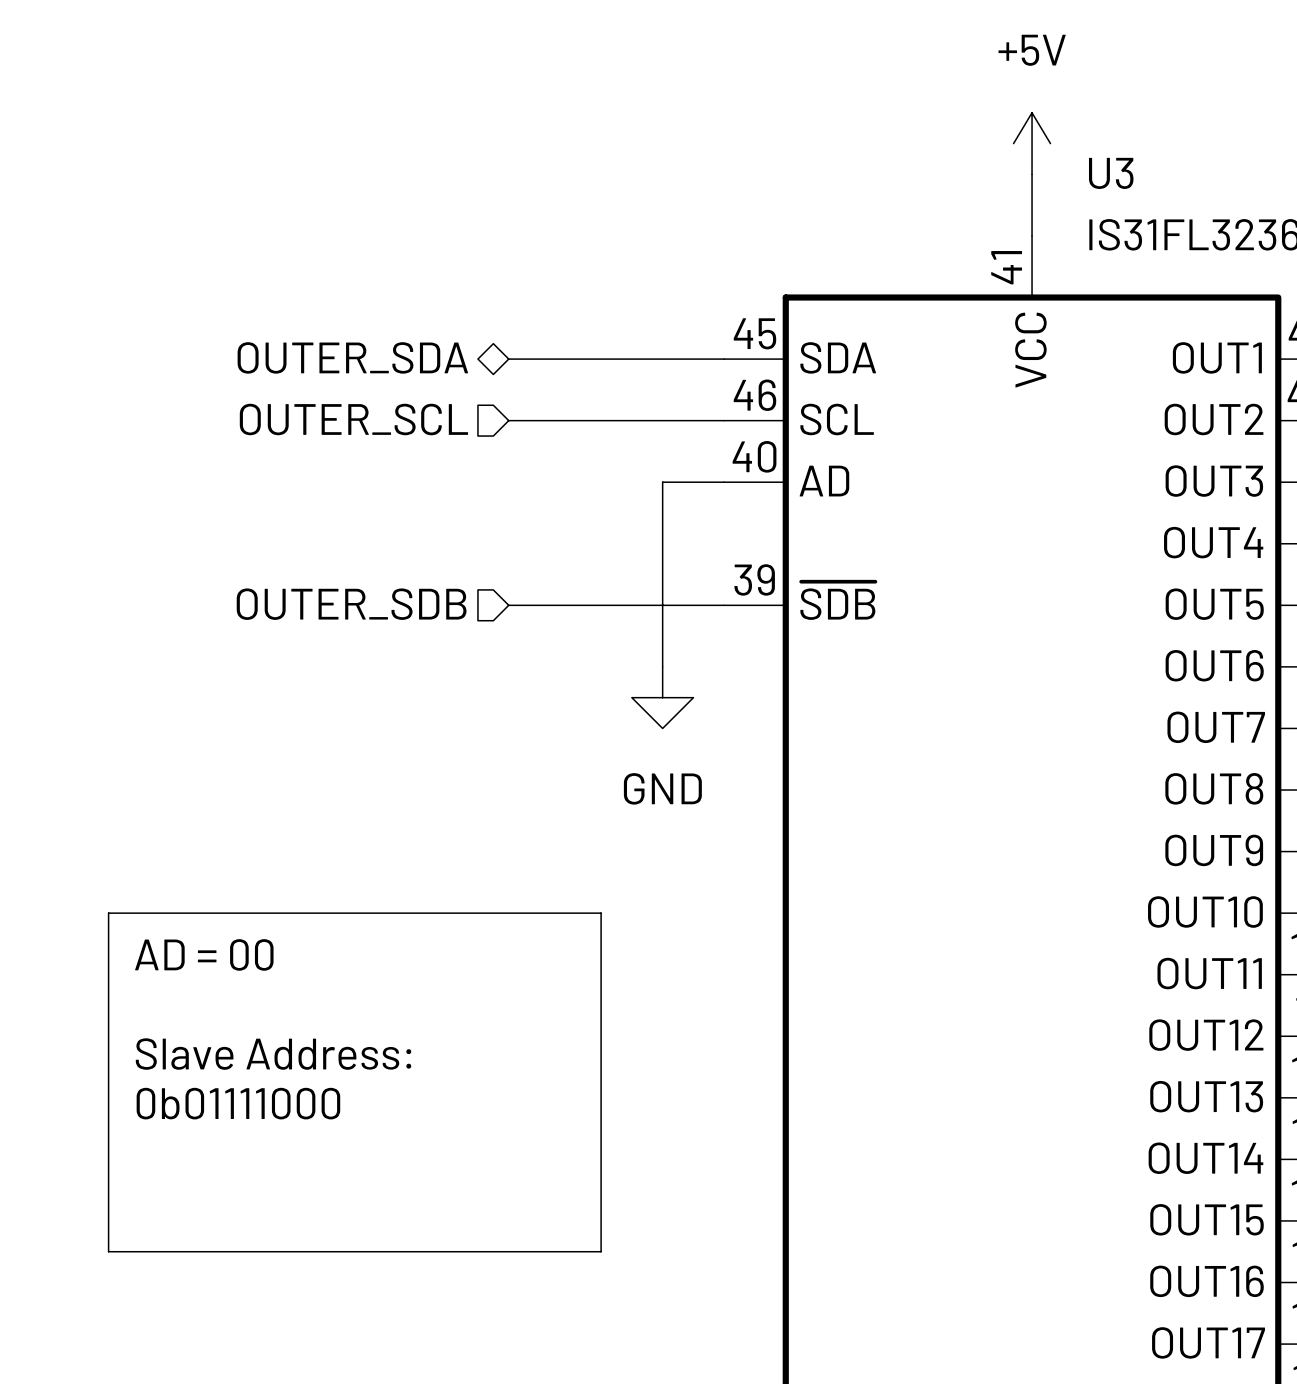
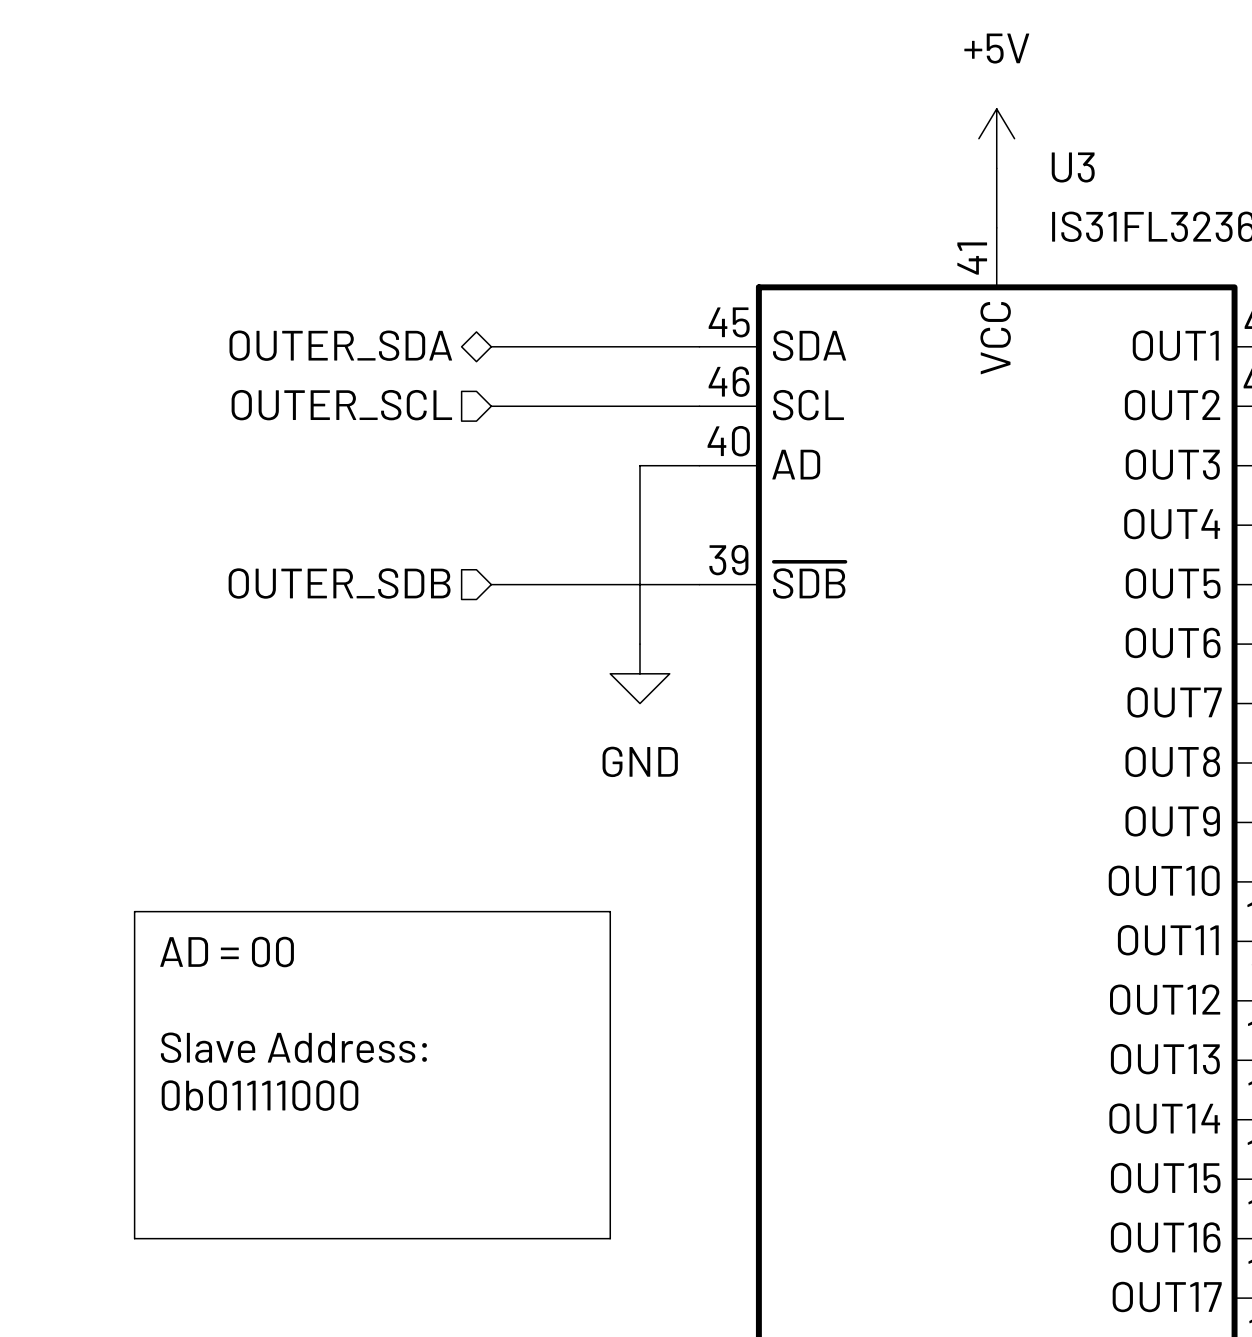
line: (108, 913) (601, 913) (601, 1251) (108, 1251) (108, 913) -> (134, 911) (134, 1238) (610, 1238) (610, 911) (134, 911)
text position: AD = 00 (204, 954) -> AD = 00 (227, 952)
text position: Slave Address: (273, 1054) -> Slave Address: (293, 1047)
text position: 0b01111000 (238, 1103) -> 0b01111000 (260, 1095)

